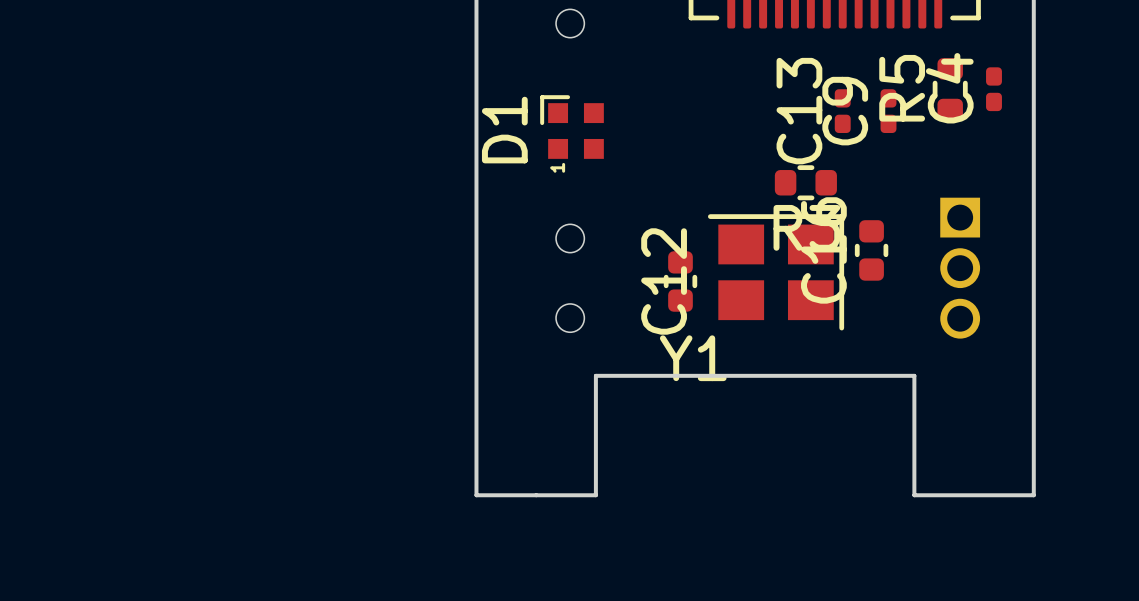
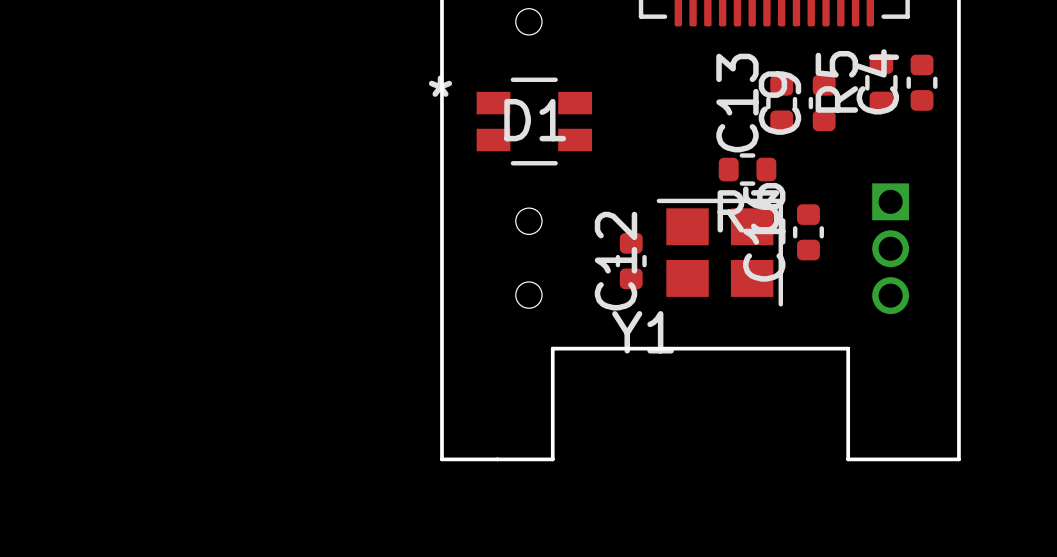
C4 footprint: [986, 67, 1002, 112] -> [906, 54, 938, 111]
C13 footprint: [834, 89, 851, 134] -> [766, 74, 798, 132]
C9 footprint: [880, 89, 897, 134] -> [808, 74, 840, 132]
D1 footprint: [540, 95, 604, 159] -> [476, 77, 592, 166]

